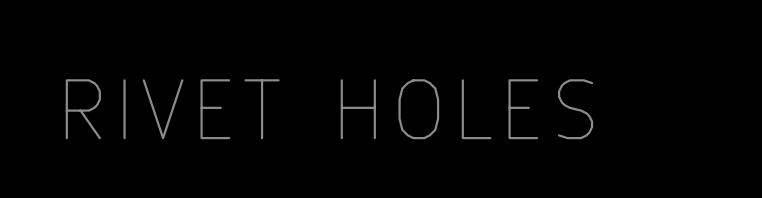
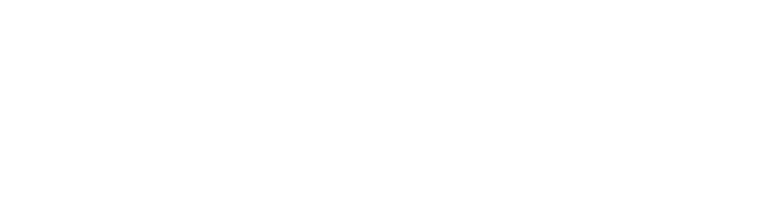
text: RIVET HOLES (329, 109) -> none

